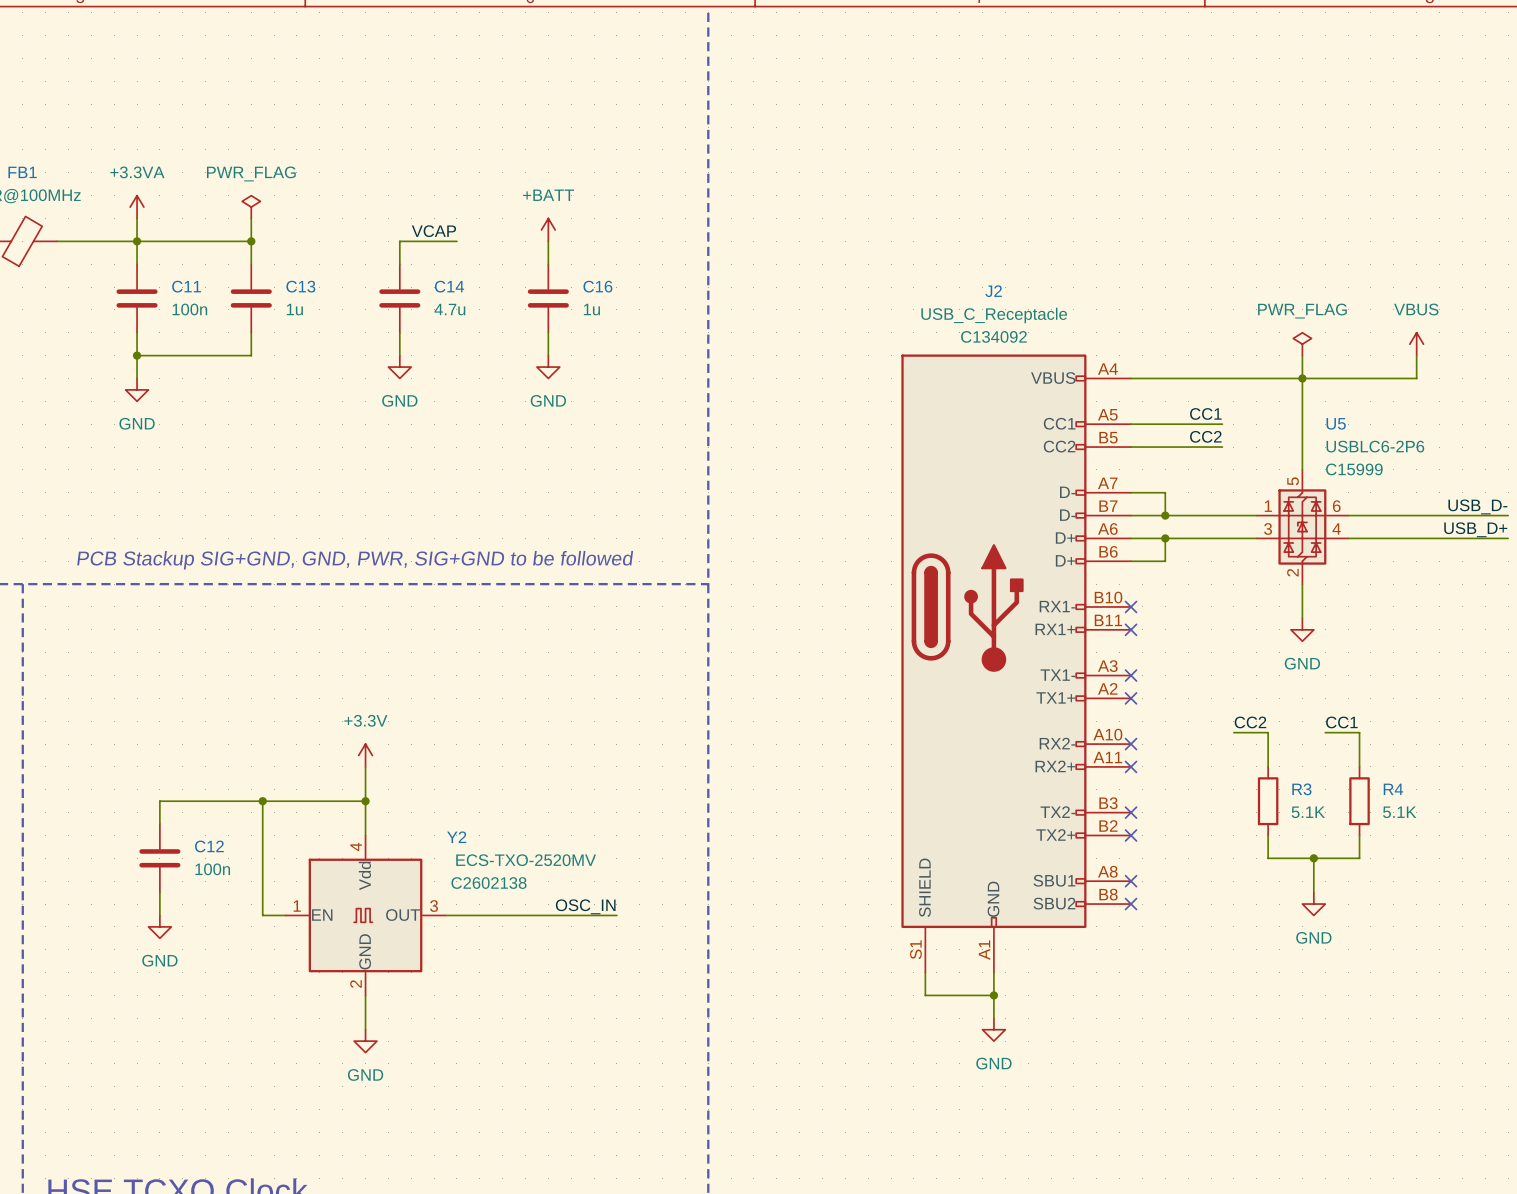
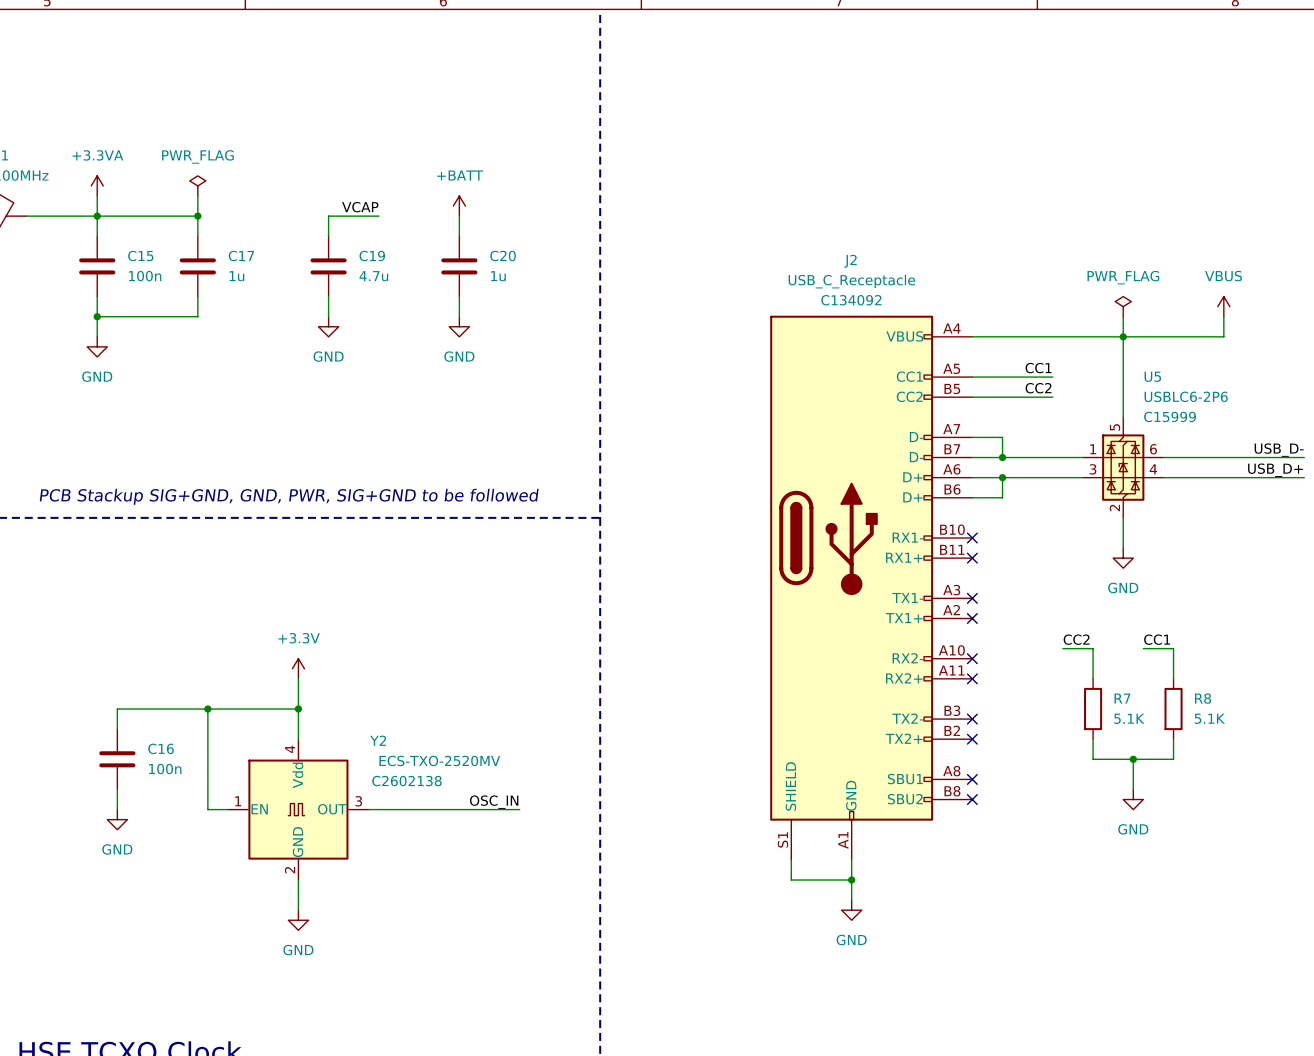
C11 name: C11 (186, 286) -> C15 (140, 255)
C13 name: C13 (300, 286) -> C17 (241, 255)
C14 name: C14 (449, 286) -> C19 (372, 255)
C16 name: C16 (597, 286) -> C20 (503, 255)
R3 name: R3 (1301, 789) -> R7 (1122, 698)
R4 name: R4 (1393, 789) -> R8 (1203, 698)
C12 name: C12 (209, 846) -> C16 (161, 748)

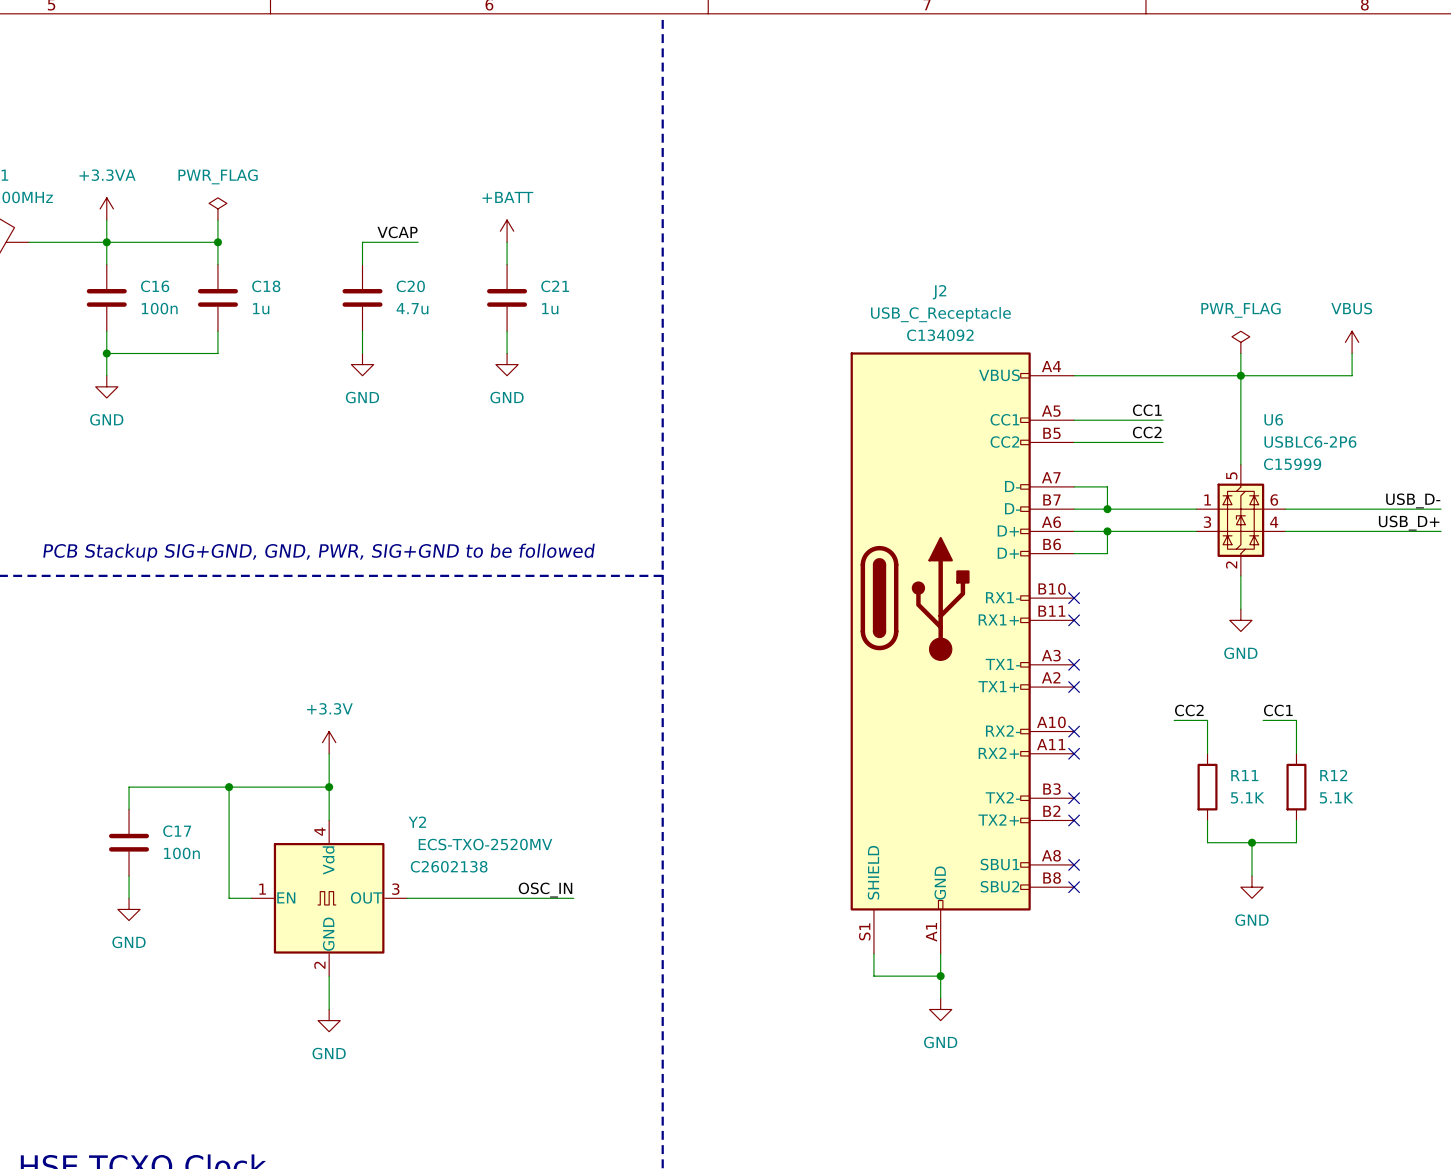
C15 name: C15 (140, 255) -> C16 (155, 286)
C17 name: C17 (241, 255) -> C18 (266, 286)
C19 name: C19 (372, 255) -> C20 (410, 286)
C20 name: C20 (503, 255) -> C21 (555, 286)
U5 name: U5 (1152, 376) -> U6 (1273, 419)
R7 name: R7 (1122, 698) -> R11 (1244, 775)
R8 name: R8 (1203, 698) -> R12 (1333, 775)
C16 name: C16 (161, 748) -> C17 (177, 831)

